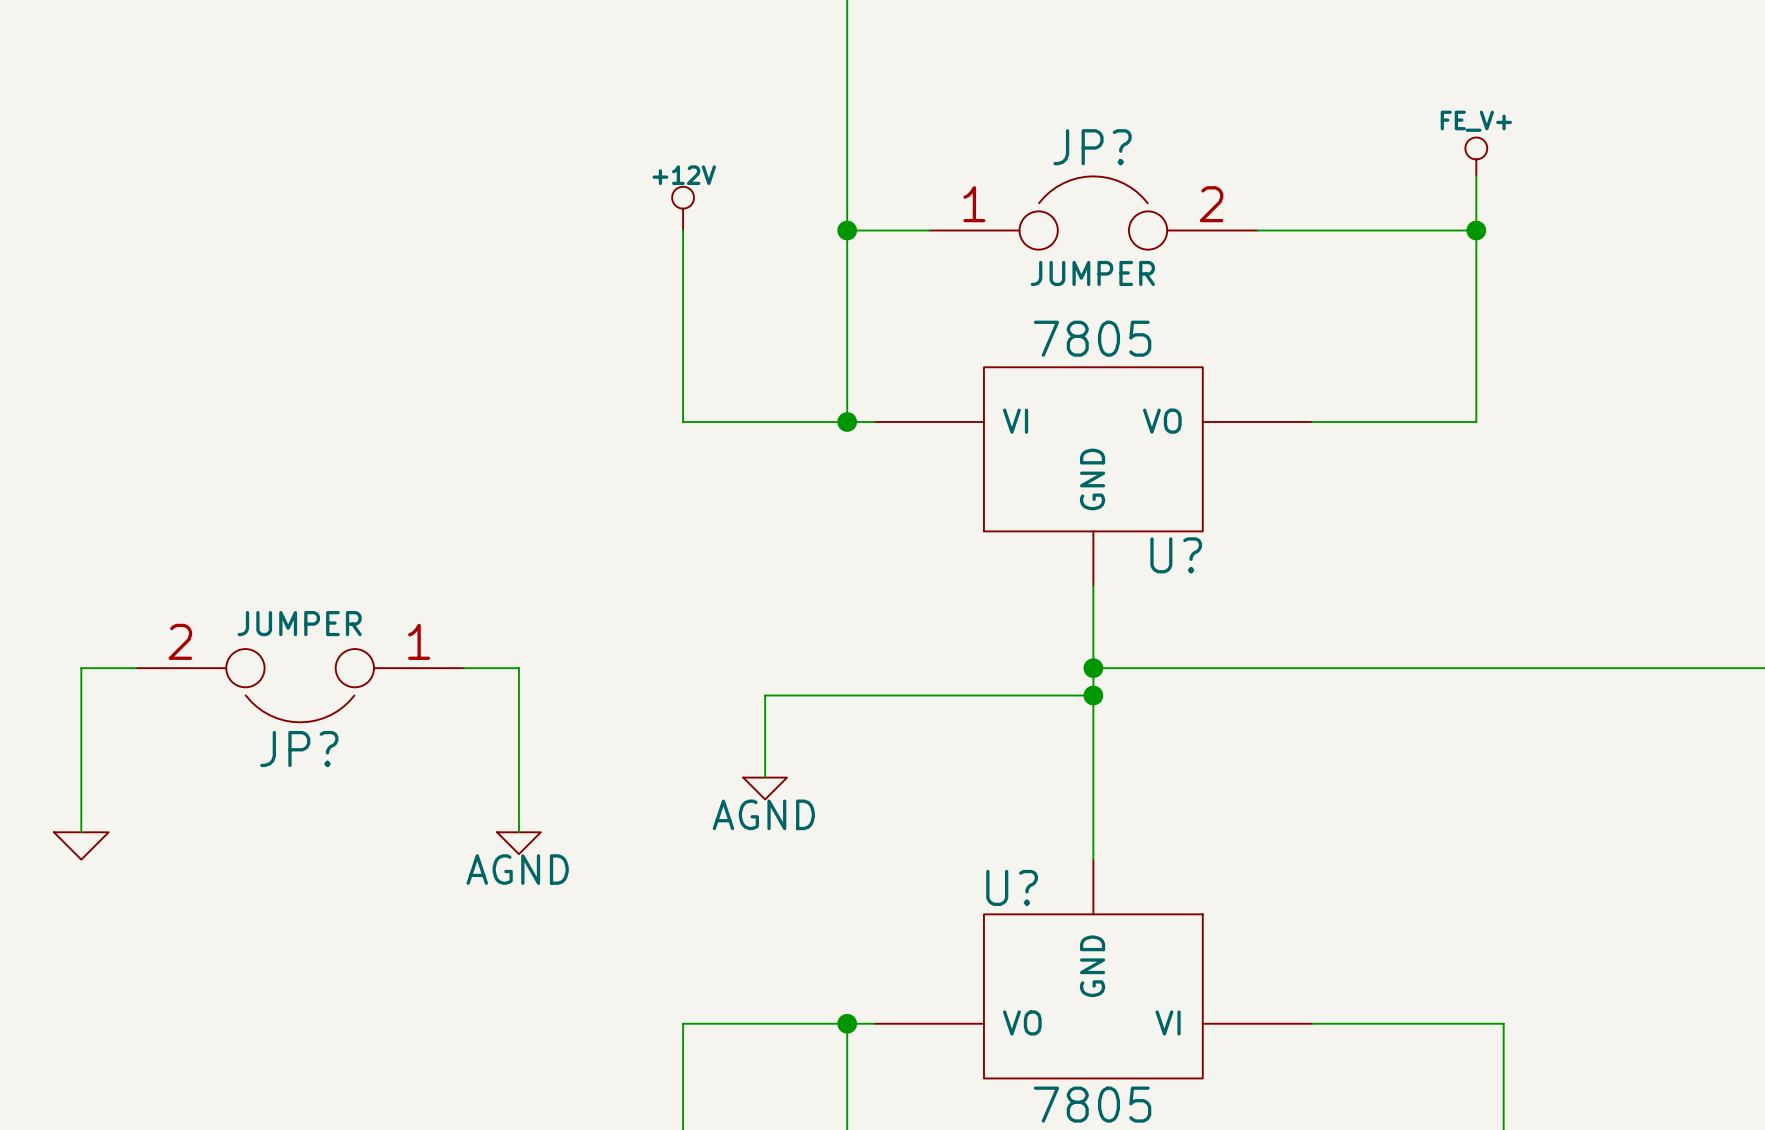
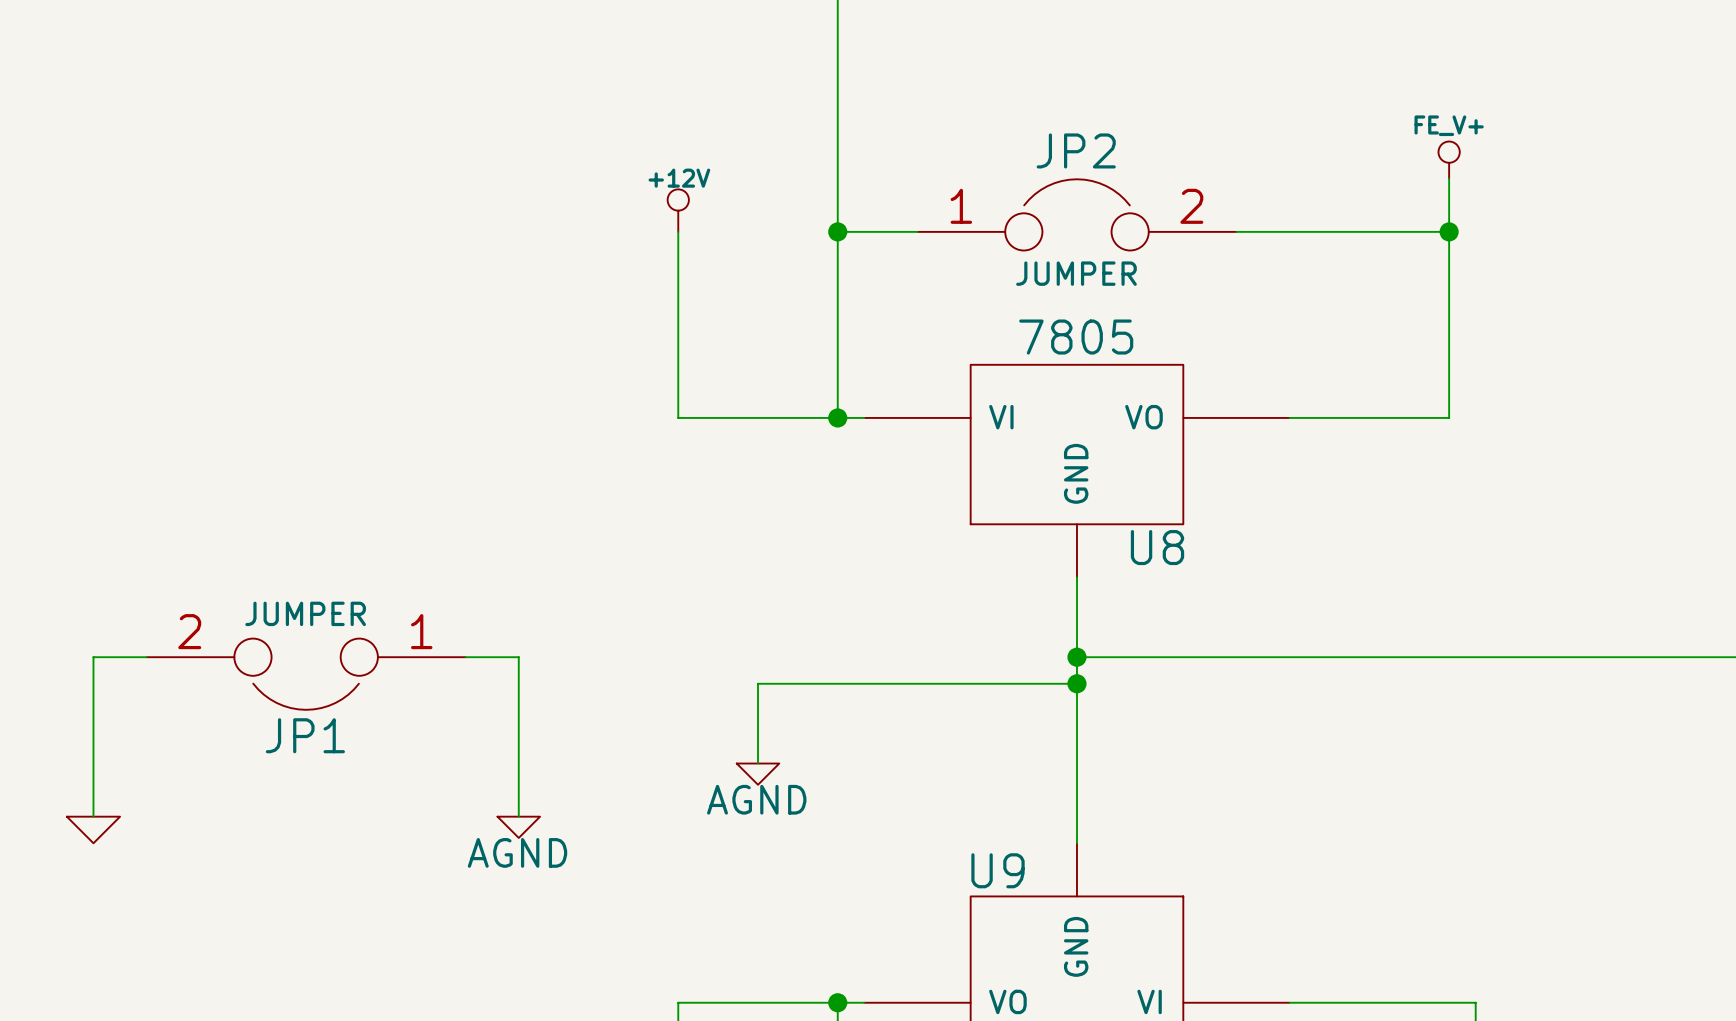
JP? name: JP? (1092, 147) -> JP2 (1076, 150)
U? name: U? (1176, 555) -> U8 (1157, 547)
JP? name: JP? (299, 749) -> JP1 (305, 735)
U? name: U? (1012, 887) -> U9 (998, 870)

